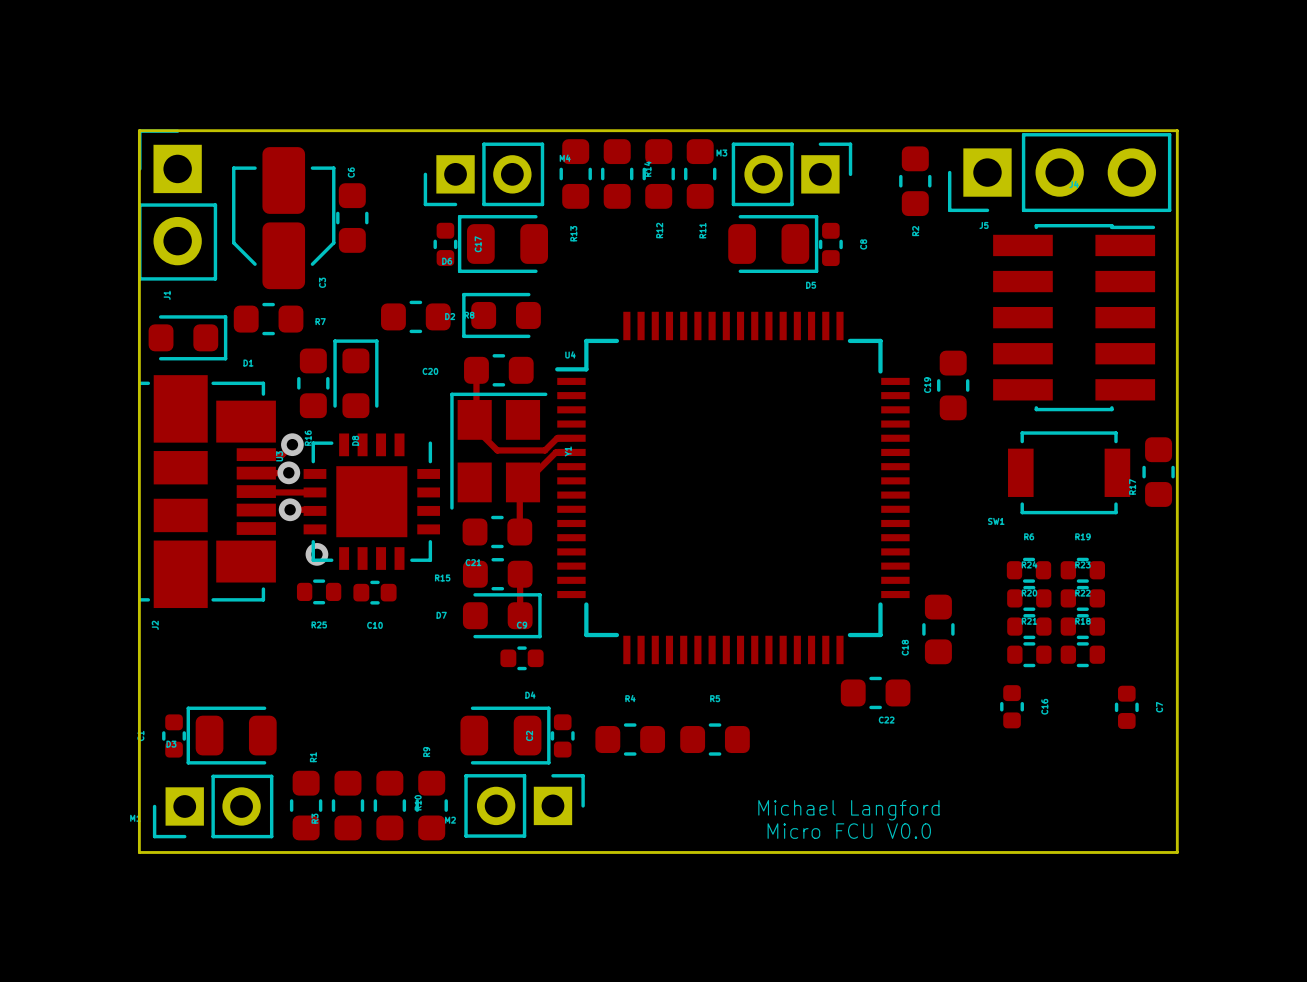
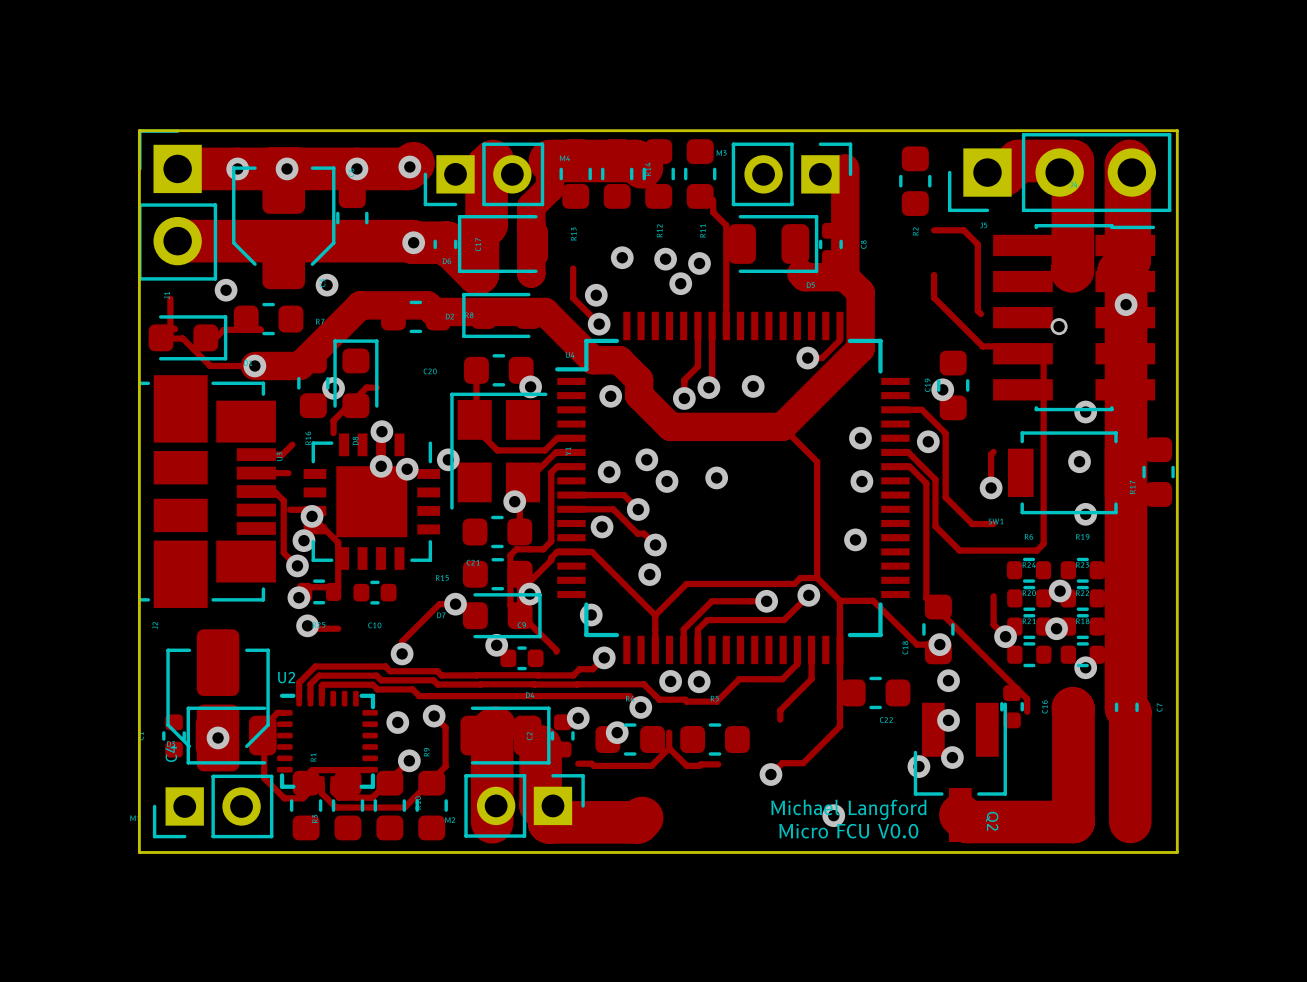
track: none -> (493, 161) (486, 167) (486, 224) (477, 233) (477, 273) (447, 242) (177, 241)
track: none -> (413, 163) (407, 168) (177, 168)
via: none -> (409, 166)
track: none -> (642, 167) (635, 161) (549, 161) (549, 188) (531, 206) (531, 273)
via: none -> (237, 168)
via: none -> (287, 168)
via: none -> (356, 168)
track: none -> (845, 168) (845, 277)
track: none -> (1004, 174) (1018, 161) (1072, 161) (1071, 271)
track: none -> (713, 199) (713, 212) (726, 225) (726, 326)
track: none -> (934, 230) (963, 230) (977, 244) (977, 310) (981, 314)
via: none -> (413, 242)
via: none -> (622, 257)
via: none -> (665, 259)
via: none -> (699, 263)
track: none -> (573, 268) (573, 298) (599, 324)
track: none -> (1118, 271) (1129, 260) (1129, 161) (1126, 164) (1126, 304) (1126, 708) (1130, 712) (1130, 822)
track: none -> (801, 273) (804, 277) (845, 277)
track: none -> (934, 275) (934, 297) (982, 346) (1030, 346) (1043, 359) (1043, 543) (1036, 550) (959, 550) (935, 526) (935, 479) (908, 452) (895, 452)
track: none -> (845, 277) (860, 292) (860, 348) (782, 426)
via: none -> (680, 283)
via: none -> (327, 285)
via: none -> (226, 290)
via: none -> (596, 295)
track: none -> (170, 298) (170, 338) (182, 338) (210, 365) (299, 365) (360, 305) (427, 305) (433, 311) (544, 311) (593, 360) (619, 360) (639, 379) (639, 395) (670, 426) (782, 426)
via: none -> (1126, 304)
via: none -> (599, 324)
track: none -> (697, 326) (697, 366) (684, 380) (684, 398)
track: none -> (712, 326) (712, 384) (708, 387)
track: none -> (839, 326) (839, 340) (822, 358) (807, 358)
via: none -> (1059, 326)
track: none -> (174, 328) (174, 329)
track: none -> (259, 329) (223, 329) (215, 338)
via: none -> (807, 358)
via: none -> (254, 365)
via: none -> (530, 386)
via: none -> (753, 386)
track: none -> (376, 387) (366, 387) (333, 420) (333, 433)
via: none -> (708, 387)
via: none -> (333, 388)
via: none -> (942, 389)
via: none -> (610, 396)
via: none -> (684, 398)
track: none -> (895, 409) (922, 409) (945, 433) (945, 497) (972, 524) (993, 524)
via: none -> (1085, 412)
track: none -> (782, 426) (817, 461) (817, 577)
via: none -> (381, 431)
via: none -> (860, 438)
via: none -> (928, 441)
via: (292, 444) -> none
track: none -> (993, 451) (991, 454) (991, 487)
via: none -> (448, 459)
via: none -> (646, 459)
via: none -> (1079, 461)
via: none -> (381, 466)
track: none -> (571, 466) (557, 466) (551, 472) (551, 541) (543, 549) (516, 549) (510, 555) (510, 605) (556, 651)
track: none -> (895, 466) (909, 466) (926, 483) (926, 598) (1027, 699) (1027, 711)
via: none -> (407, 469)
via: (288, 472) -> none
via: none -> (609, 472)
via: none -> (716, 477)
via: none -> (667, 481)
via: none -> (861, 481)
via: none -> (991, 487)
track: (256, 491) (314, 492) -> (256, 491) (274, 491) (283, 500) (283, 552) (297, 565)
track: none -> (571, 495) (623, 495) (638, 509)
via: none -> (514, 501)
via position: (290, 509) -> (312, 516)
track: none -> (571, 509) (613, 509) (637, 533) (644, 533) (655, 544)
via: none -> (638, 509)
via: none -> (1085, 514)
track: none -> (312, 516) (338, 542) (338, 587) (309, 587) (298, 597)
via: none -> (602, 526)
via: none -> (855, 539)
via: none -> (303, 540)
via: none -> (655, 544)
via: (316, 554) -> none
via: none -> (297, 565)
via: none -> (649, 574)
track: none -> (817, 577) (800, 577) (794, 583) (686, 583) (655, 615)
track: none -> (817, 577) (839, 600)
via: none -> (1060, 591)
track: none -> (529, 594) (529, 581) (557, 551) (591, 551) (655, 615)
via: none -> (529, 594)
track: none -> (808, 595) (784, 620) (707, 620) (697, 629) (697, 649)
via: none -> (808, 595)
track: none -> (993, 596) (993, 624) (1005, 636)
via: none -> (298, 597)
track: none -> (839, 600) (839, 726) (803, 763) (782, 763) (770, 774)
track: none -> (839, 600) (873, 600) (916, 644) (939, 644)
track: none -> (766, 601) (711, 601) (683, 629) (683, 649)
via: none -> (766, 601)
track: none -> (455, 604) (439, 604) (402, 641) (402, 653)
via: none -> (455, 604)
via: none -> (591, 615)
track: none -> (655, 615) (655, 649)
track: none -> (307, 625) (310, 628) (338, 628)
via: none -> (307, 625)
via: none -> (1056, 628)
via: none -> (1005, 636)
via: none -> (939, 644)
via: none -> (496, 645)
track: none -> (797, 649) (797, 664) (782, 679) (739, 679) (716, 701) (659, 699) (643, 684) (577, 684)
track: none -> (811, 649) (811, 679) (780, 710) (780, 719)
via: none -> (402, 653)
track: none -> (604, 657) (592, 669) (579, 669) (573, 675) (538, 675)
via: none -> (604, 657)
via: none -> (1085, 667)
track: none -> (476, 675) (537, 675)
track: none -> (476, 675) (441, 675) (437, 671) (390, 671) (385, 666) (315, 666) (299, 682) (299, 698)
via: none -> (948, 680)
via: none -> (670, 681)
via: none -> (699, 681)
track: none -> (480, 684) (534, 684)
track: none -> (480, 684) (437, 684) (433, 680) (381, 680) (376, 675) (319, 675) (310, 684) (310, 698)
track: none -> (534, 684) (577, 684)
track: none -> (321, 698) (322, 684) (372, 684) (377, 689) (412, 689) (419, 696) (629, 696) (640, 707)
C4: none -> (218, 700)
via: none -> (640, 707)
track: none -> (1072, 708) (1073, 822) (967, 822) (960, 815)
track: none -> (284, 712) (277, 712) (264, 726) (264, 778) (284, 798) (302, 798) (310, 790) (310, 771) (312, 770) (370, 769)
track: none -> (434, 716) (445, 727) (445, 766) (404, 807) (336, 807) (321, 793) (321, 783)
via: none -> (434, 716)
via: none -> (578, 718)
via: none -> (948, 720)
via: none -> (397, 722)
track: none -> (495, 727) (492, 730) (492, 822)
via: none -> (617, 732)
track: none -> (669, 732) (669, 748)
via: none -> (218, 737)
U2: none -> (327, 741)
track: none -> (540, 746) (540, 805) (549, 813) (549, 822) (637, 822) (642, 817)
track: none -> (669, 748) (651, 765) (593, 765) (591, 763) (578, 763)
track: none -> (669, 748) (686, 765) (718, 764)
via: none -> (952, 757)
track: none -> (409, 760) (372, 797) (339, 797) (333, 791) (333, 783)
via: none -> (409, 760)
via: none -> (918, 766)
Q2: none -> (960, 772)
via: none -> (770, 774)
via: none -> (833, 815)

